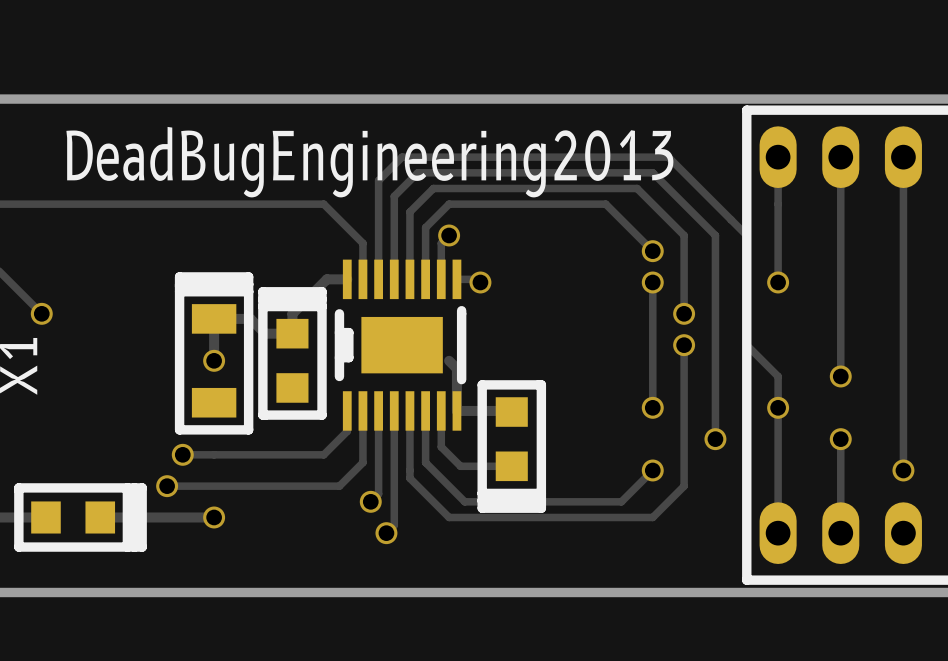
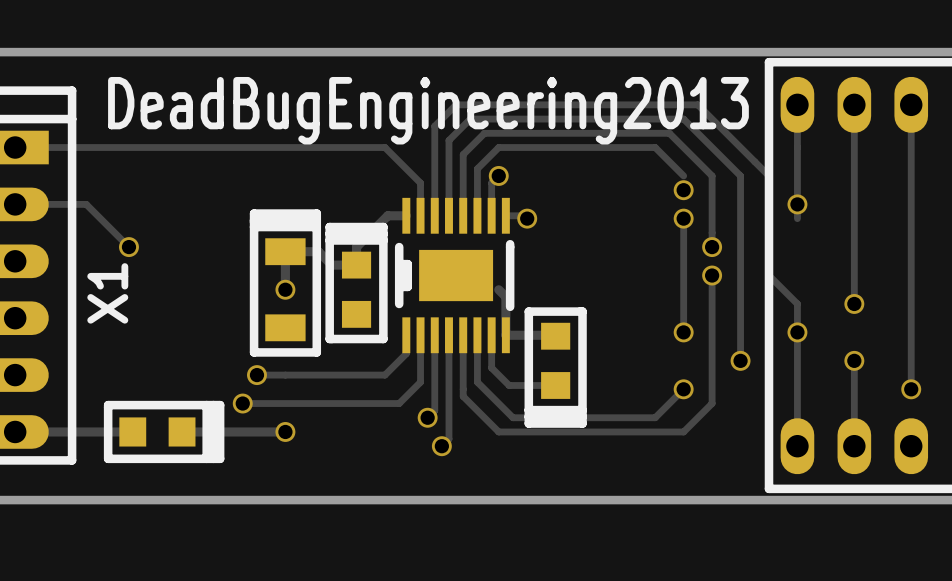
track: (605, 204) (652, 251) -> (640, 147) (655, 147) (683, 175)
via position: (778, 282) -> (797, 204)

